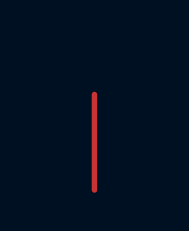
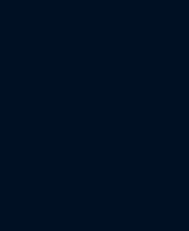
track: (94, 94) (94, 190) -> none

